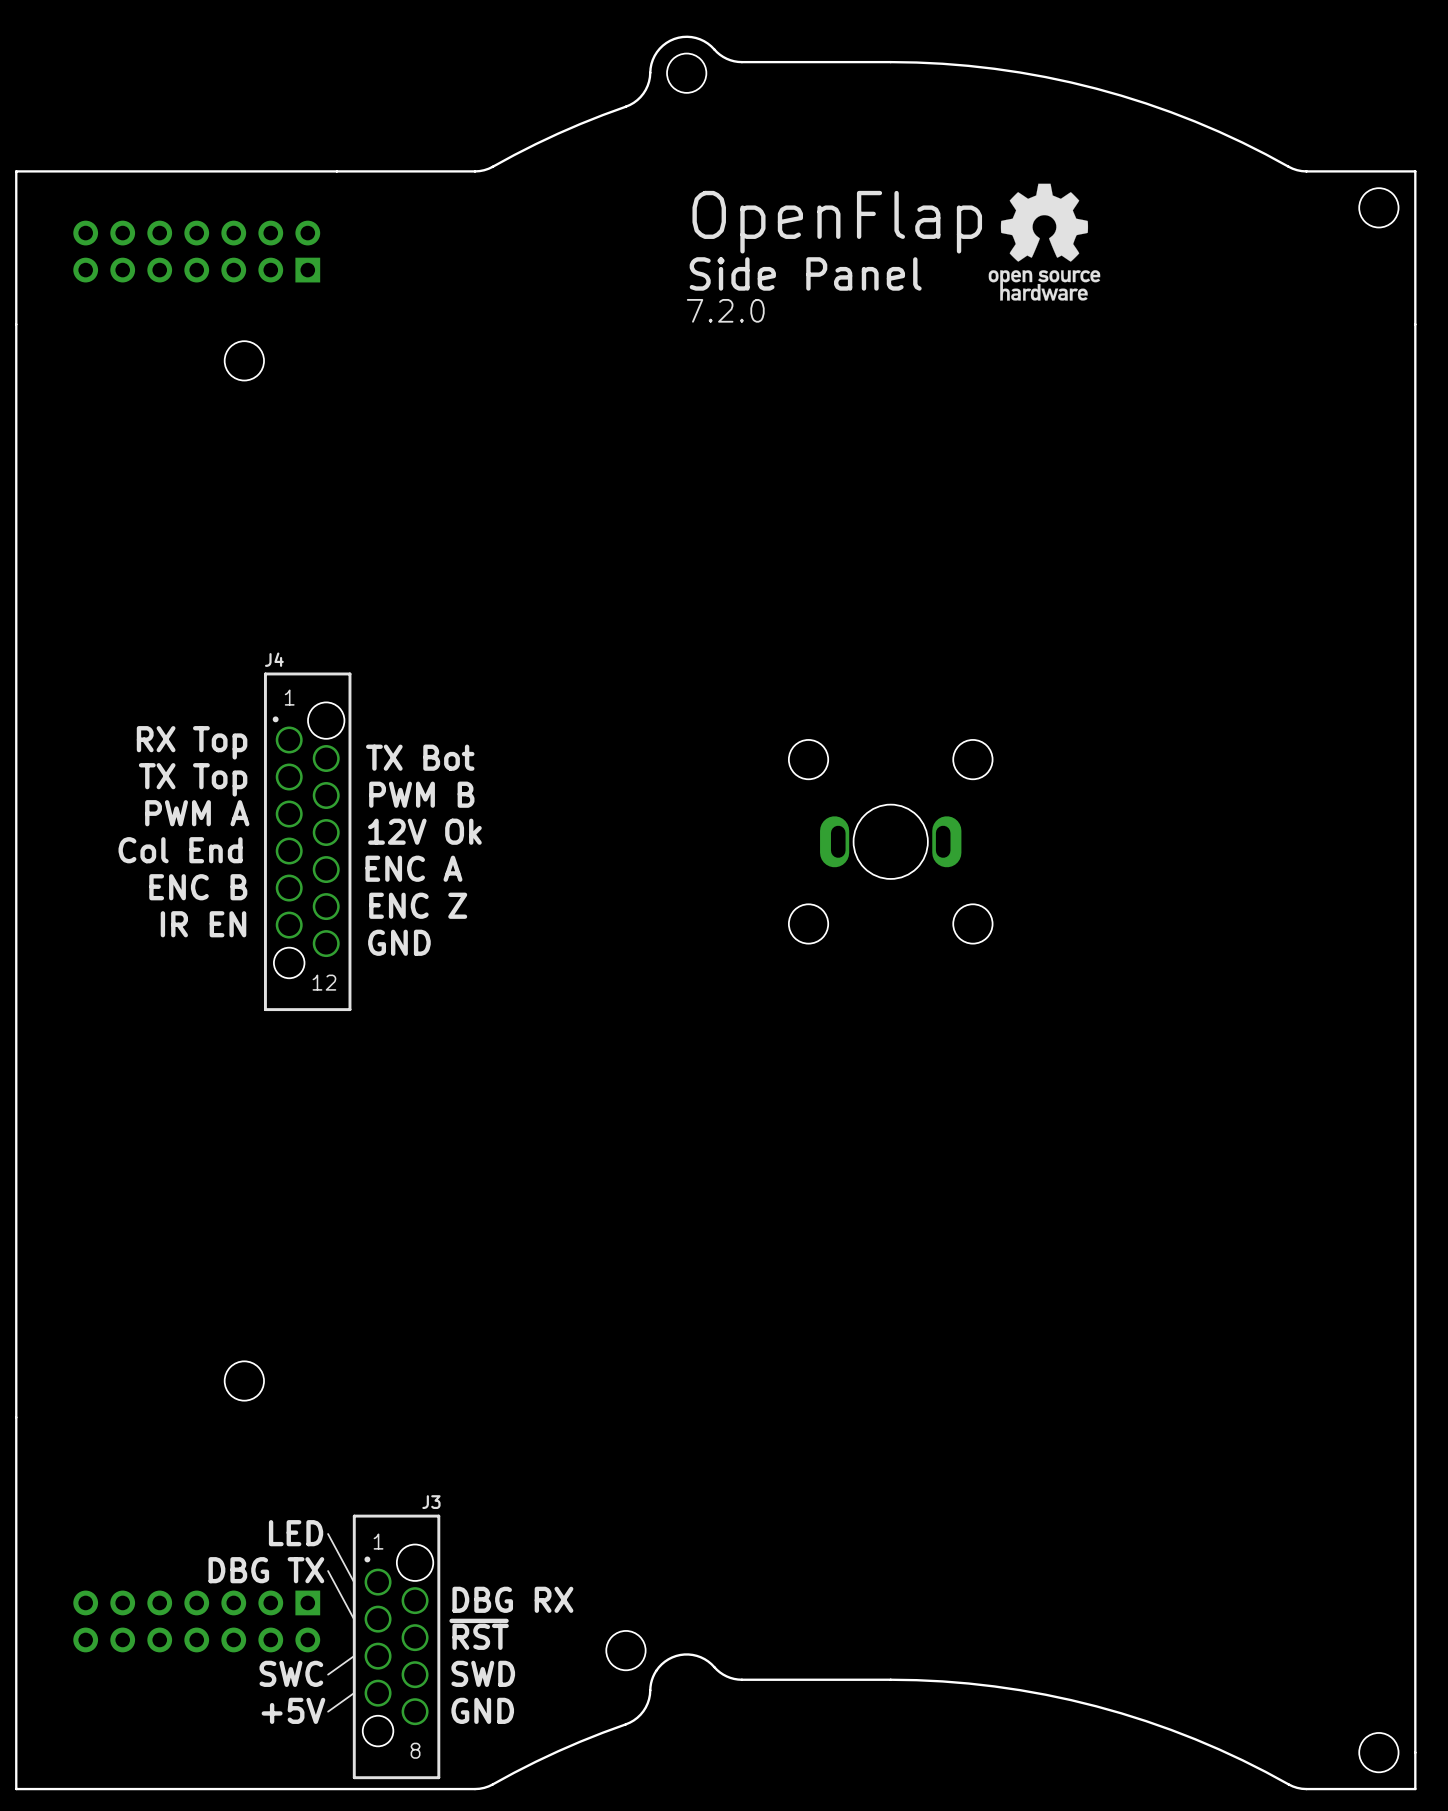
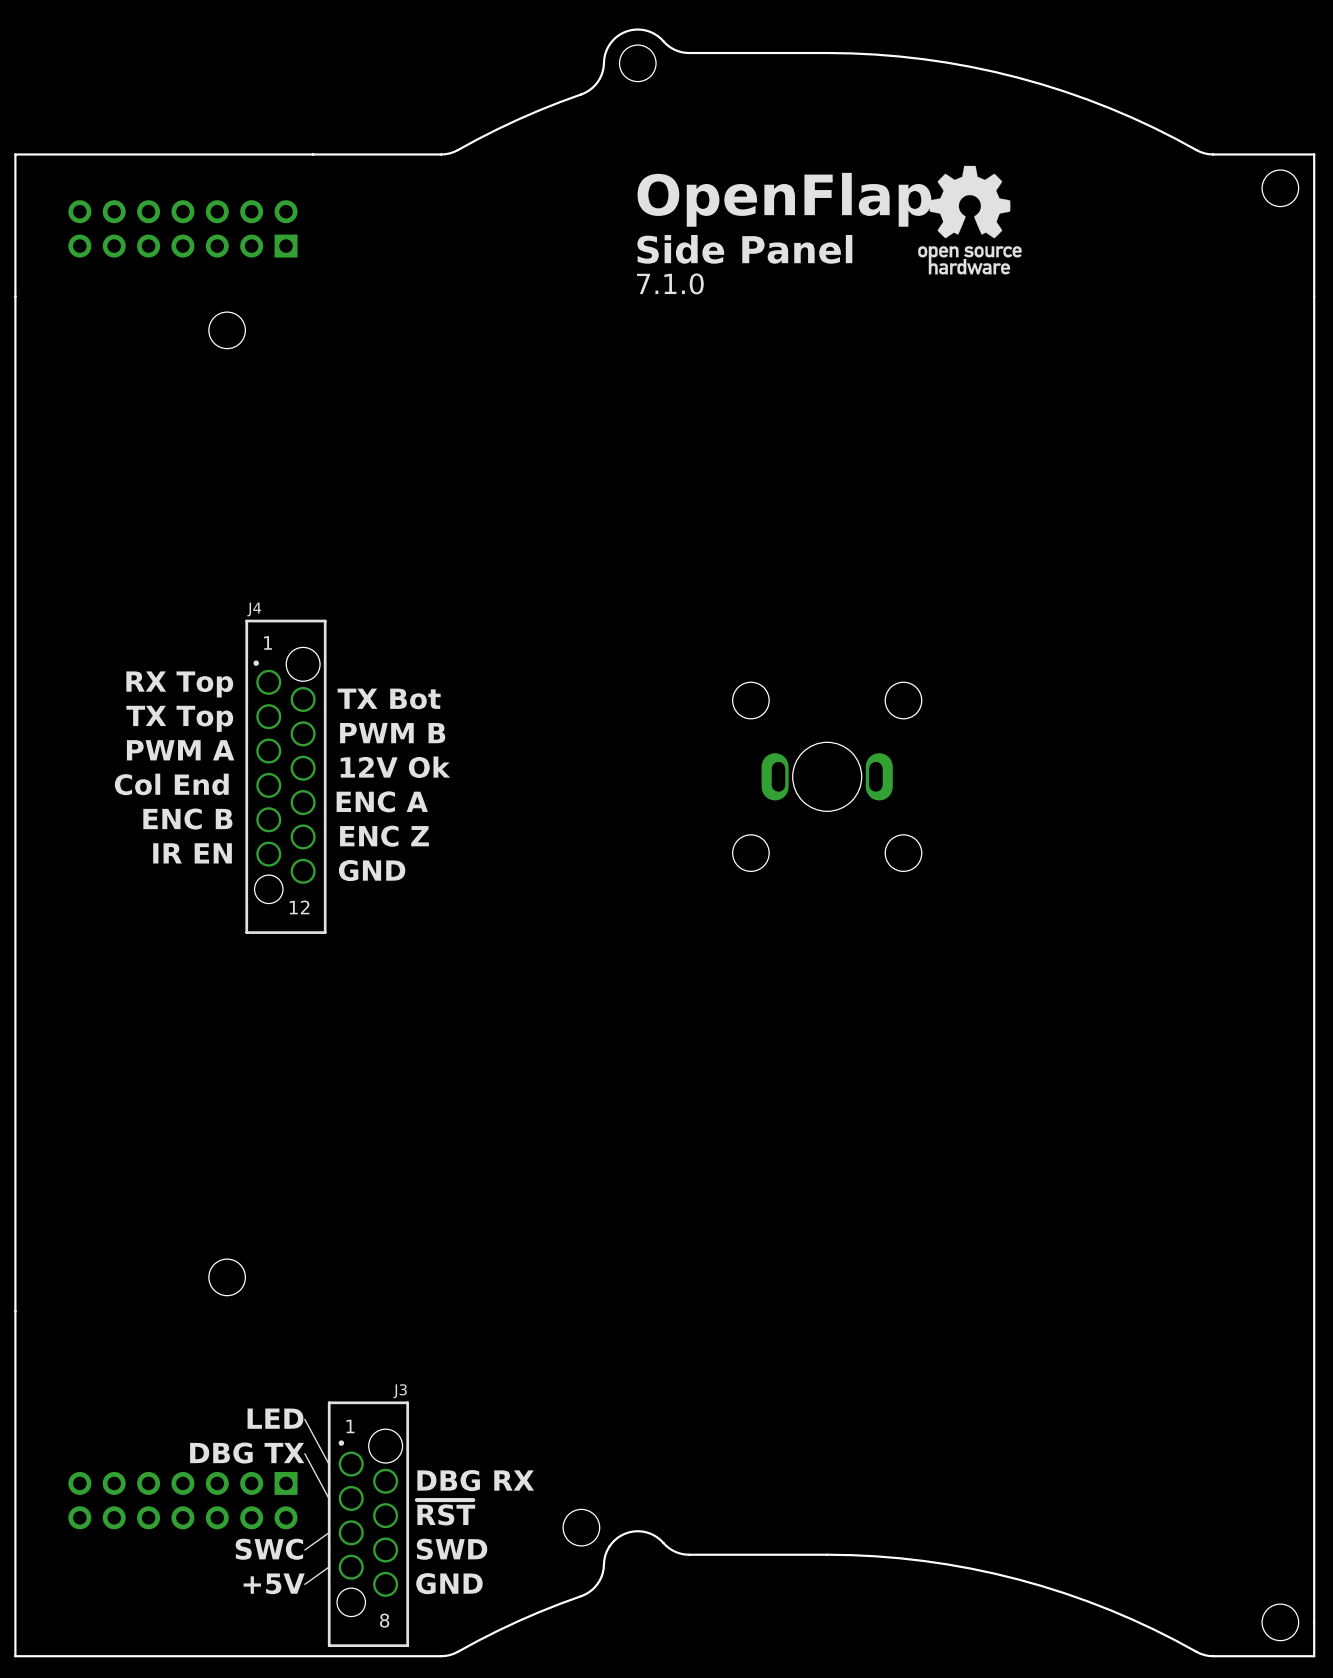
text: 7.2.0 (725, 310) -> 7.1.0 (670, 283)

